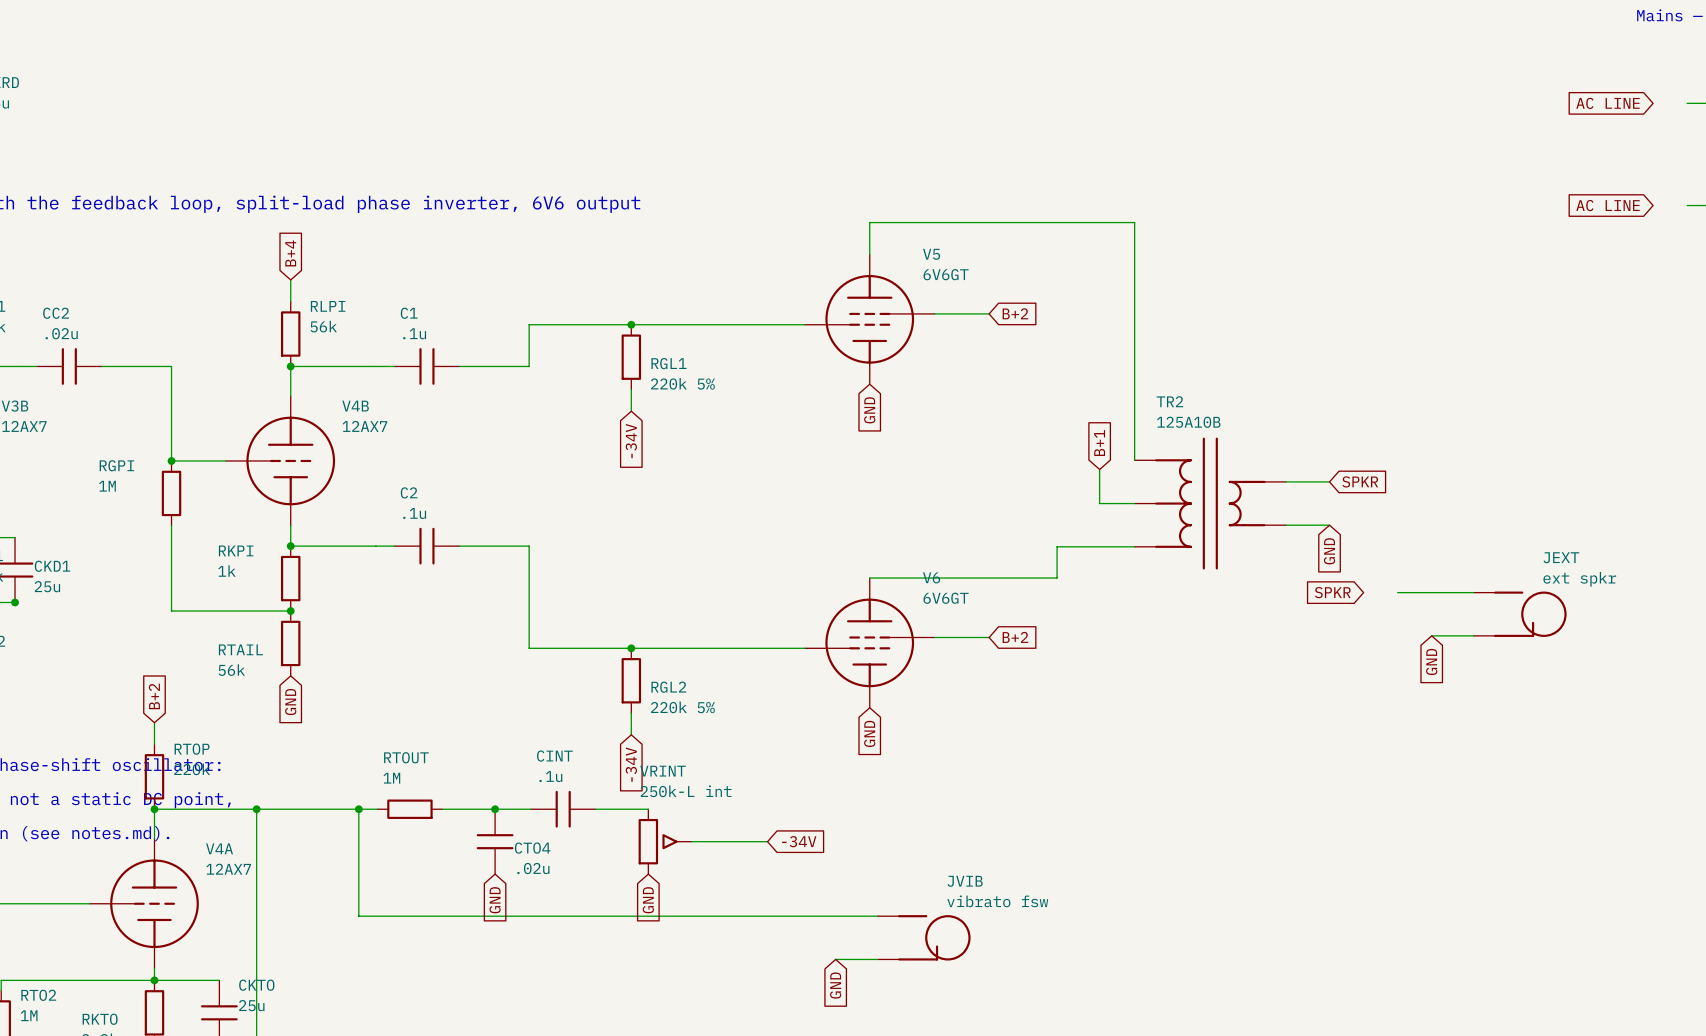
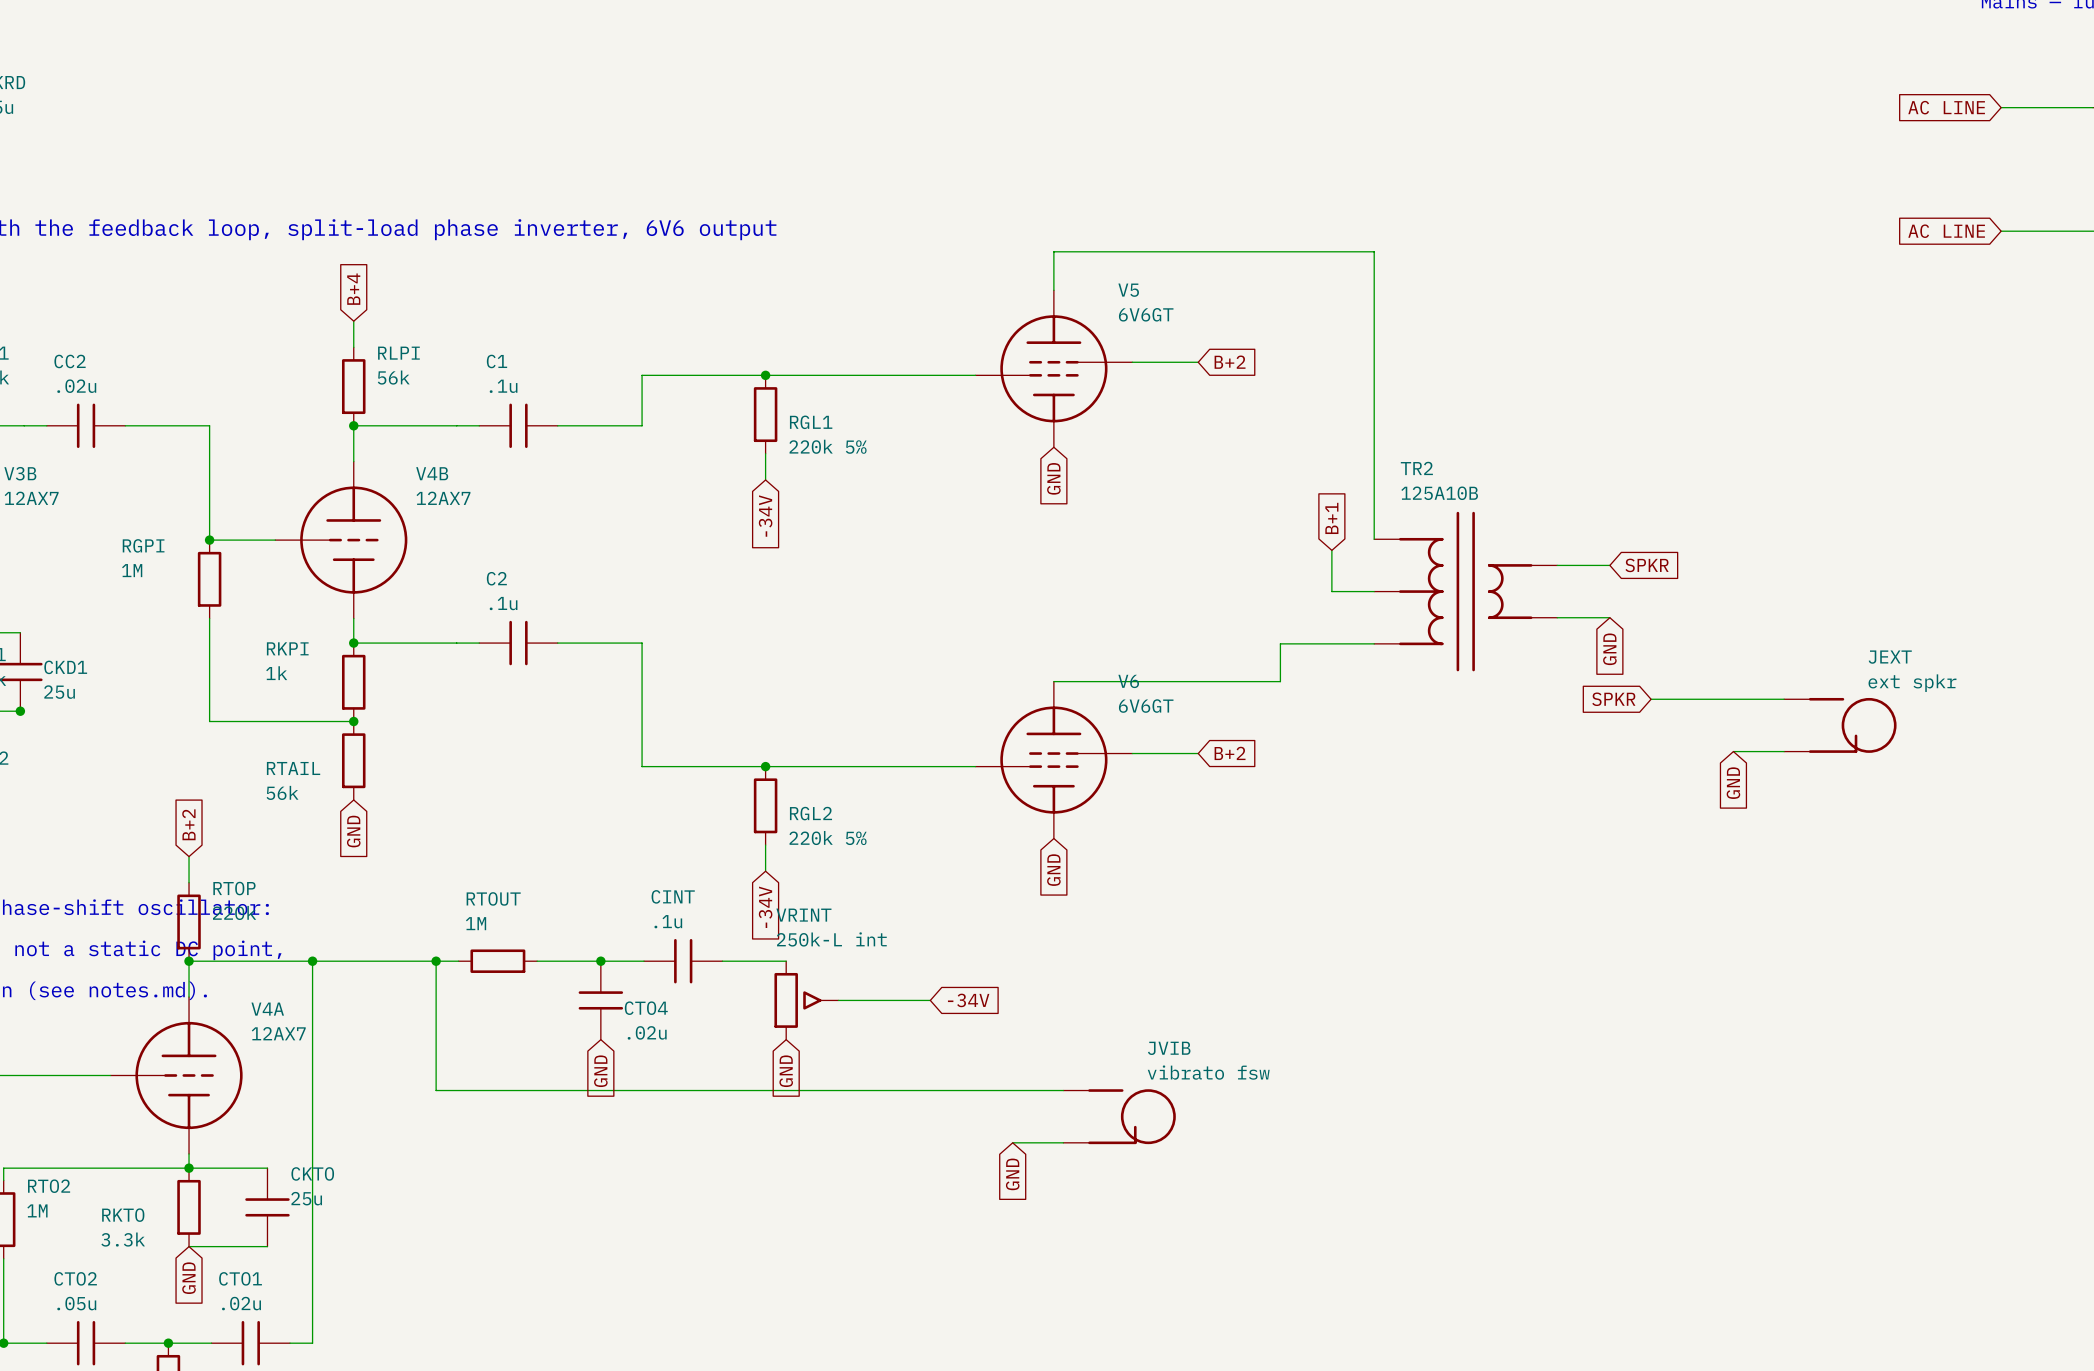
wire: none -> (2001, 107) (2042, 107)
wire: none -> (2001, 231) (2042, 231)
wire: none -> (1651, 699) (1692, 699)

